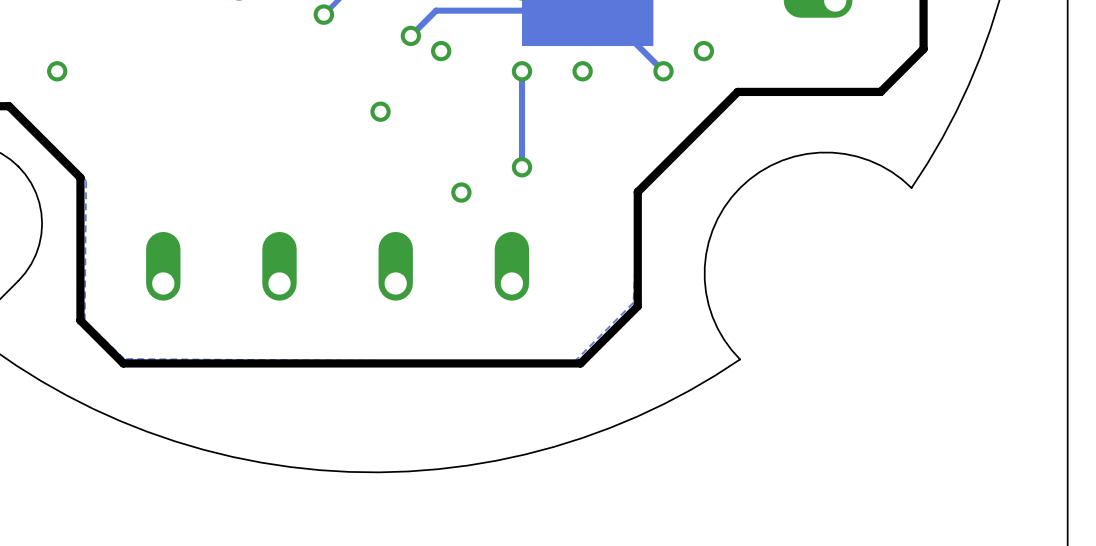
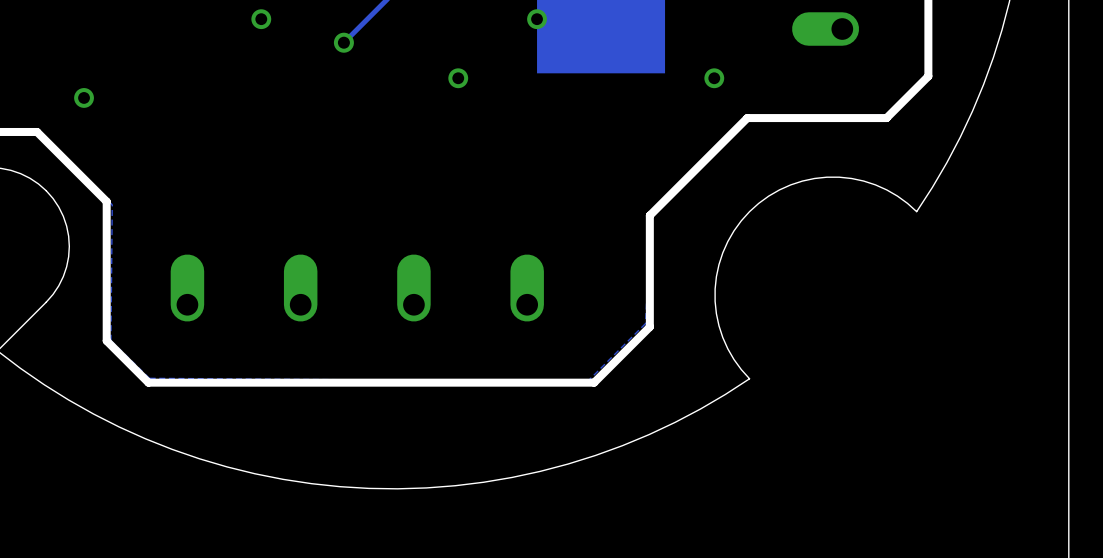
track: (410, 35) (436, 10) (602, 10) (663, 71) -> none
via: (410, 35) -> none
track: (522, 71) (522, 167) -> none
via: (522, 71) -> none
via: (582, 71) -> none
via: (663, 71) -> none
via: (380, 111) -> none
via: (522, 167) -> none
via: (461, 192) -> none

